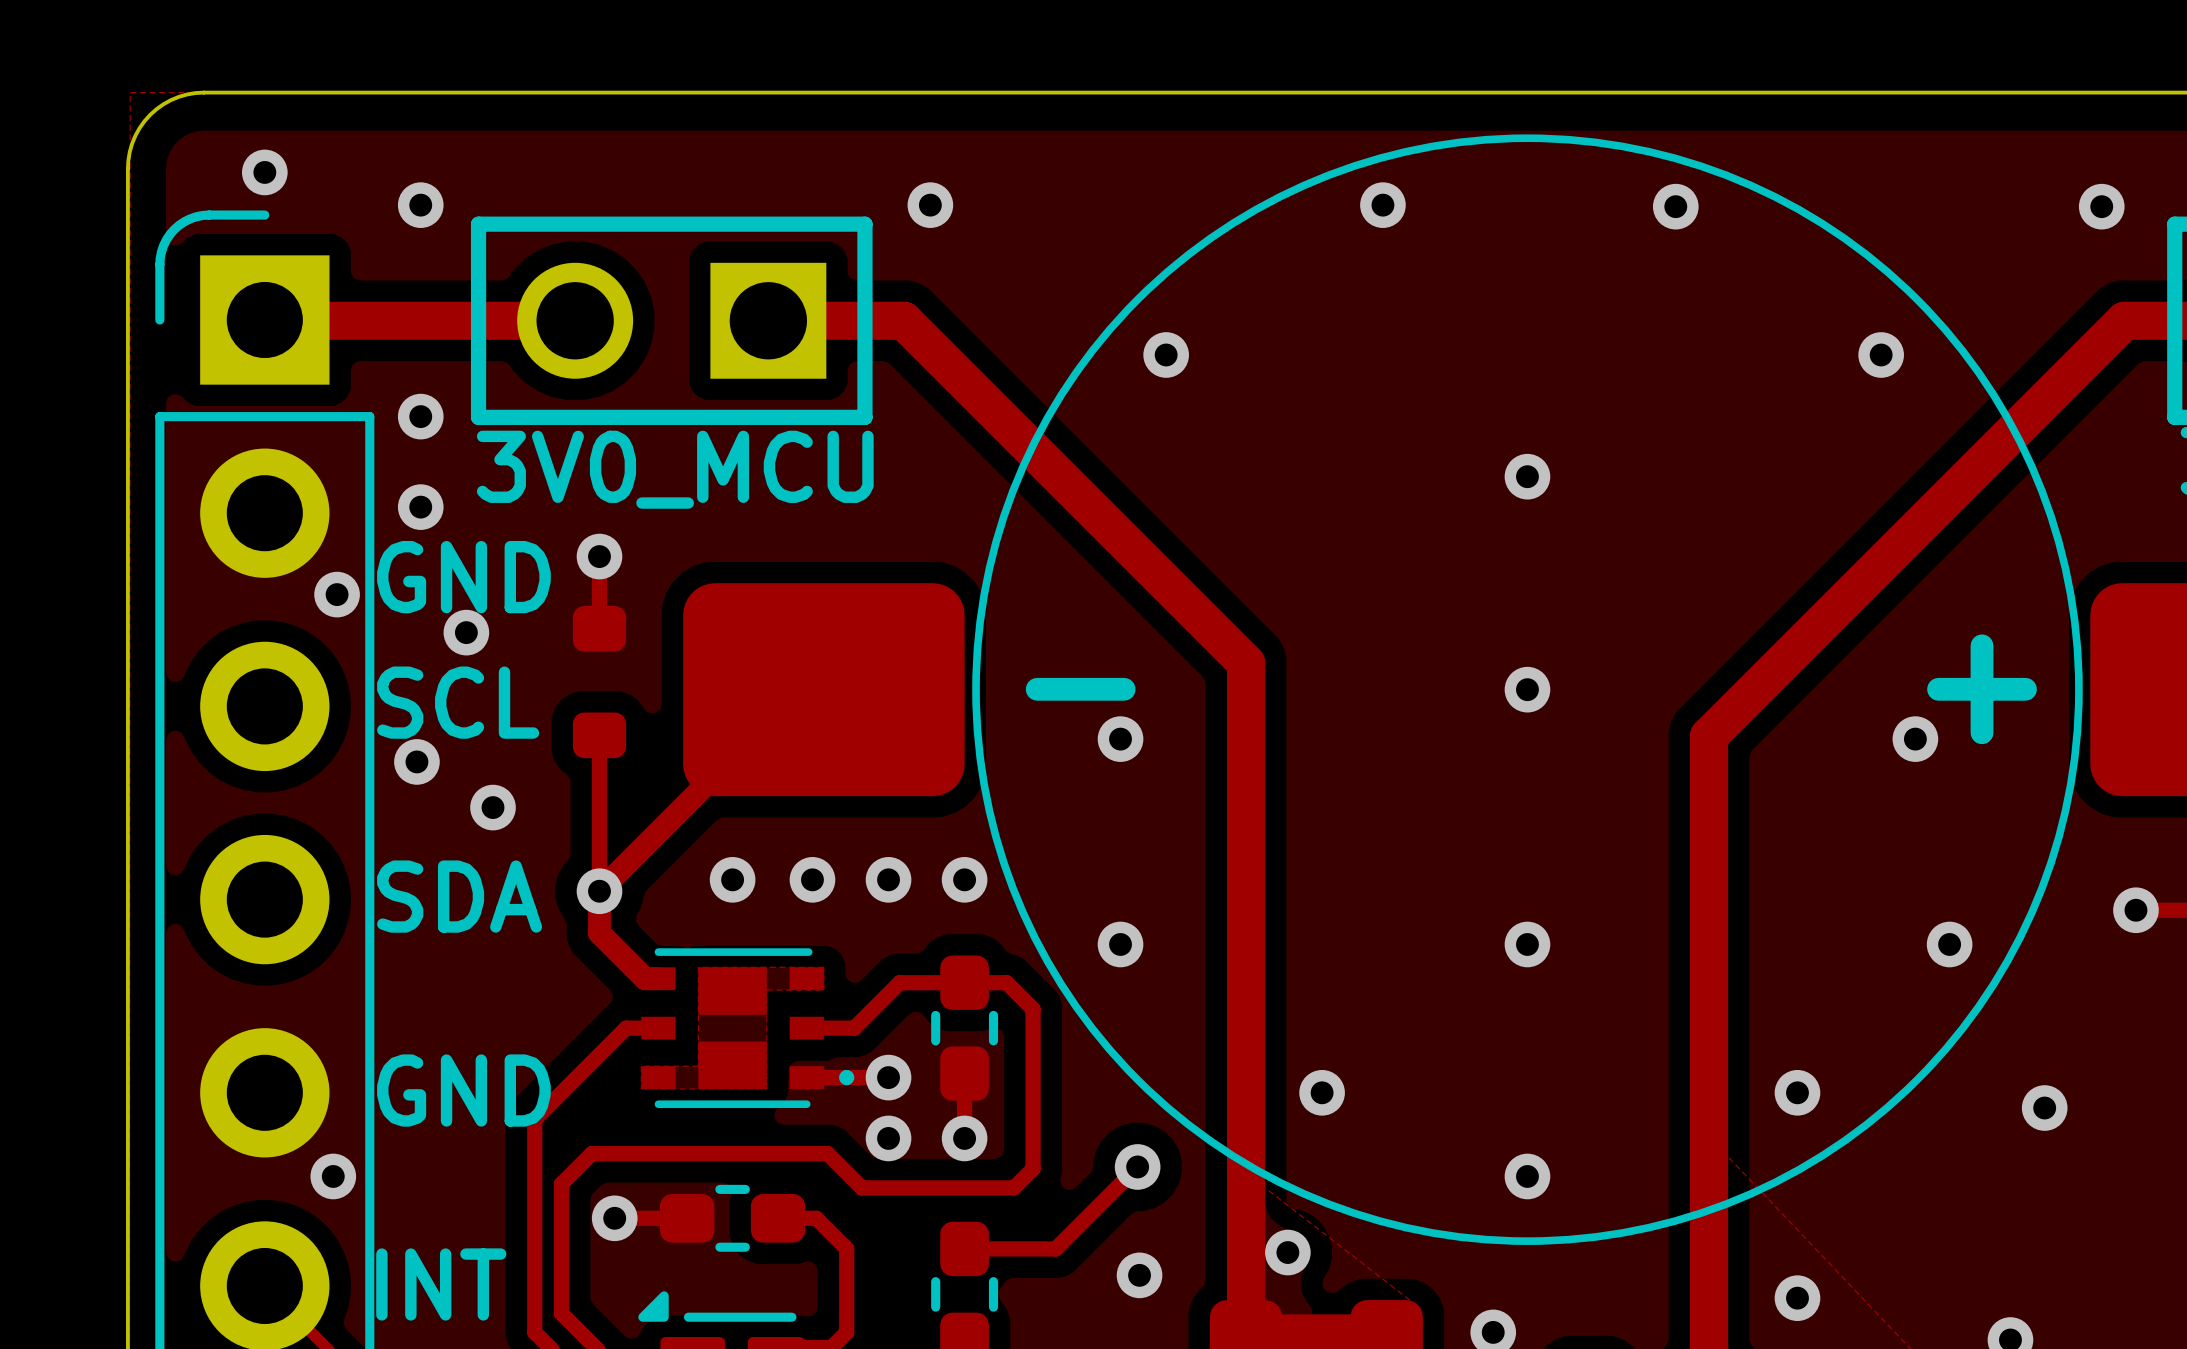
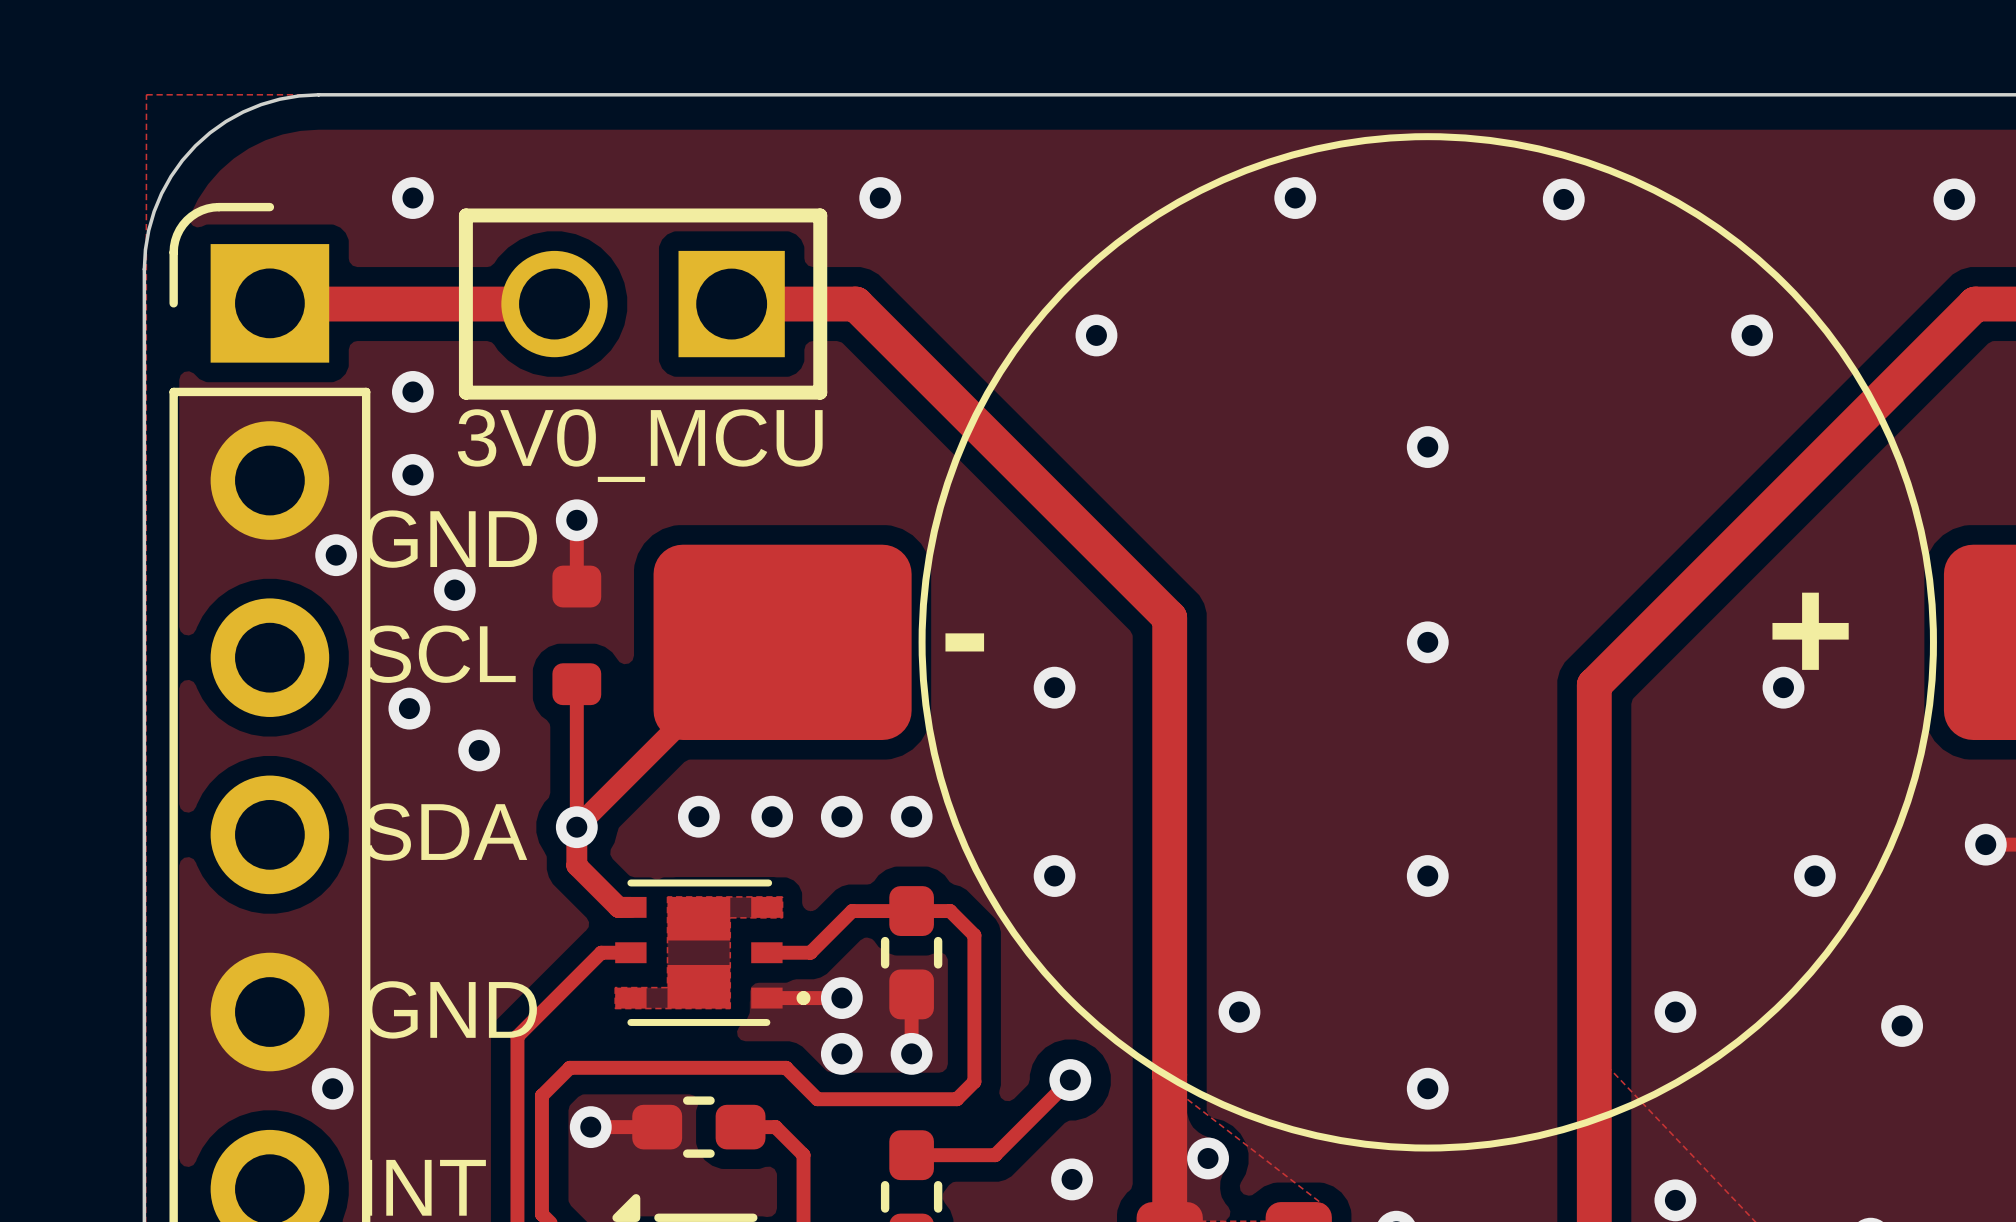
board edge: (318, 92) (195, 93) (170, 100) (150, 114) (135, 135) (128, 160) (127, 282) -> (318, 94) (299, 95) (261, 104) (225, 121) (195, 145) (171, 176) (154, 211) (145, 249) (144, 269)
via: (264, 172) -> none

